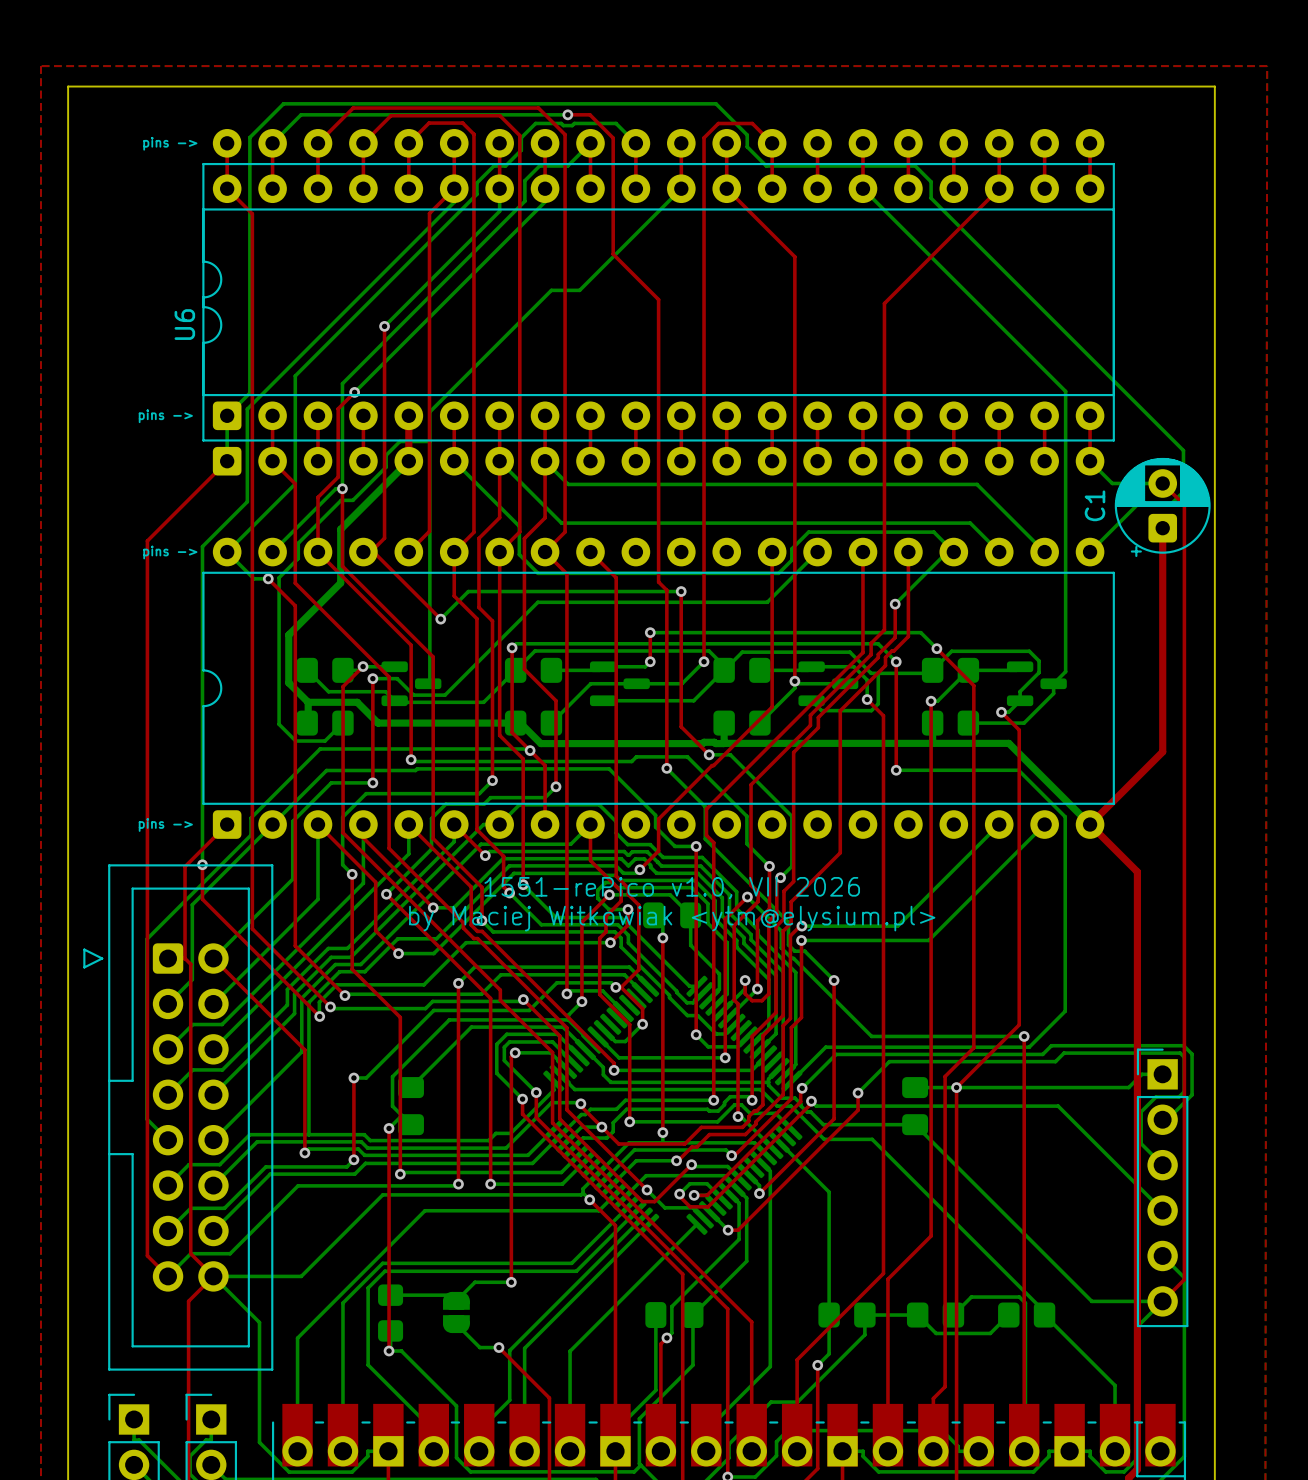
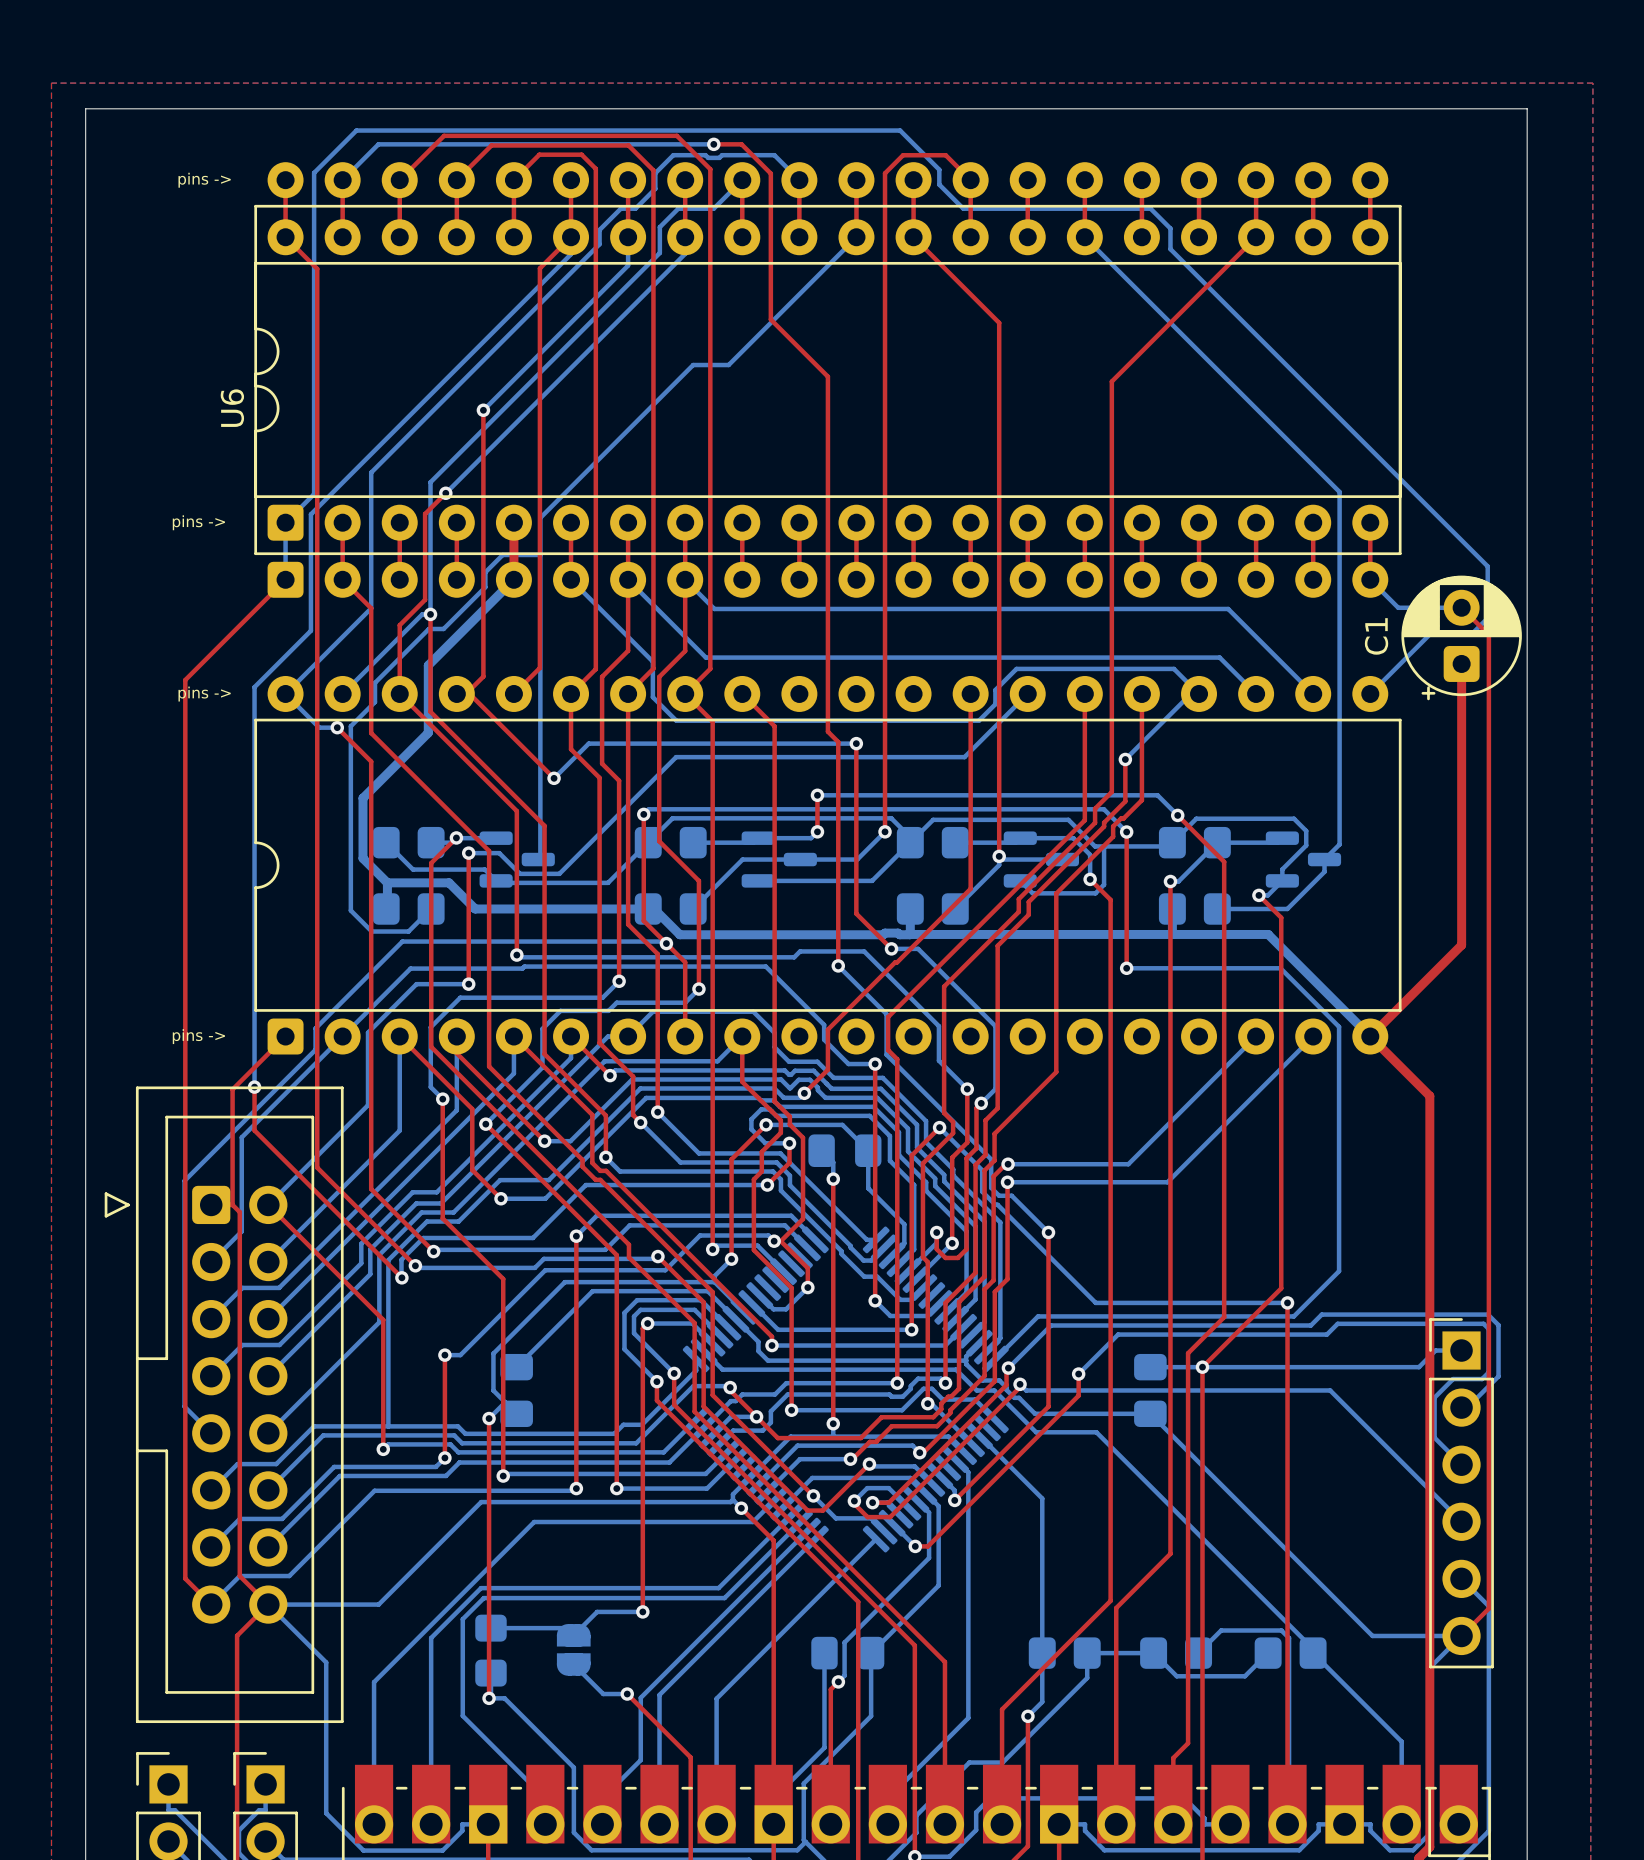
text: 1551-rePico v1.0, VII 2026 (672, 888) -> none
text: by Maciej Witkowiak <ytm@elysium.pl> (672, 918) -> none

